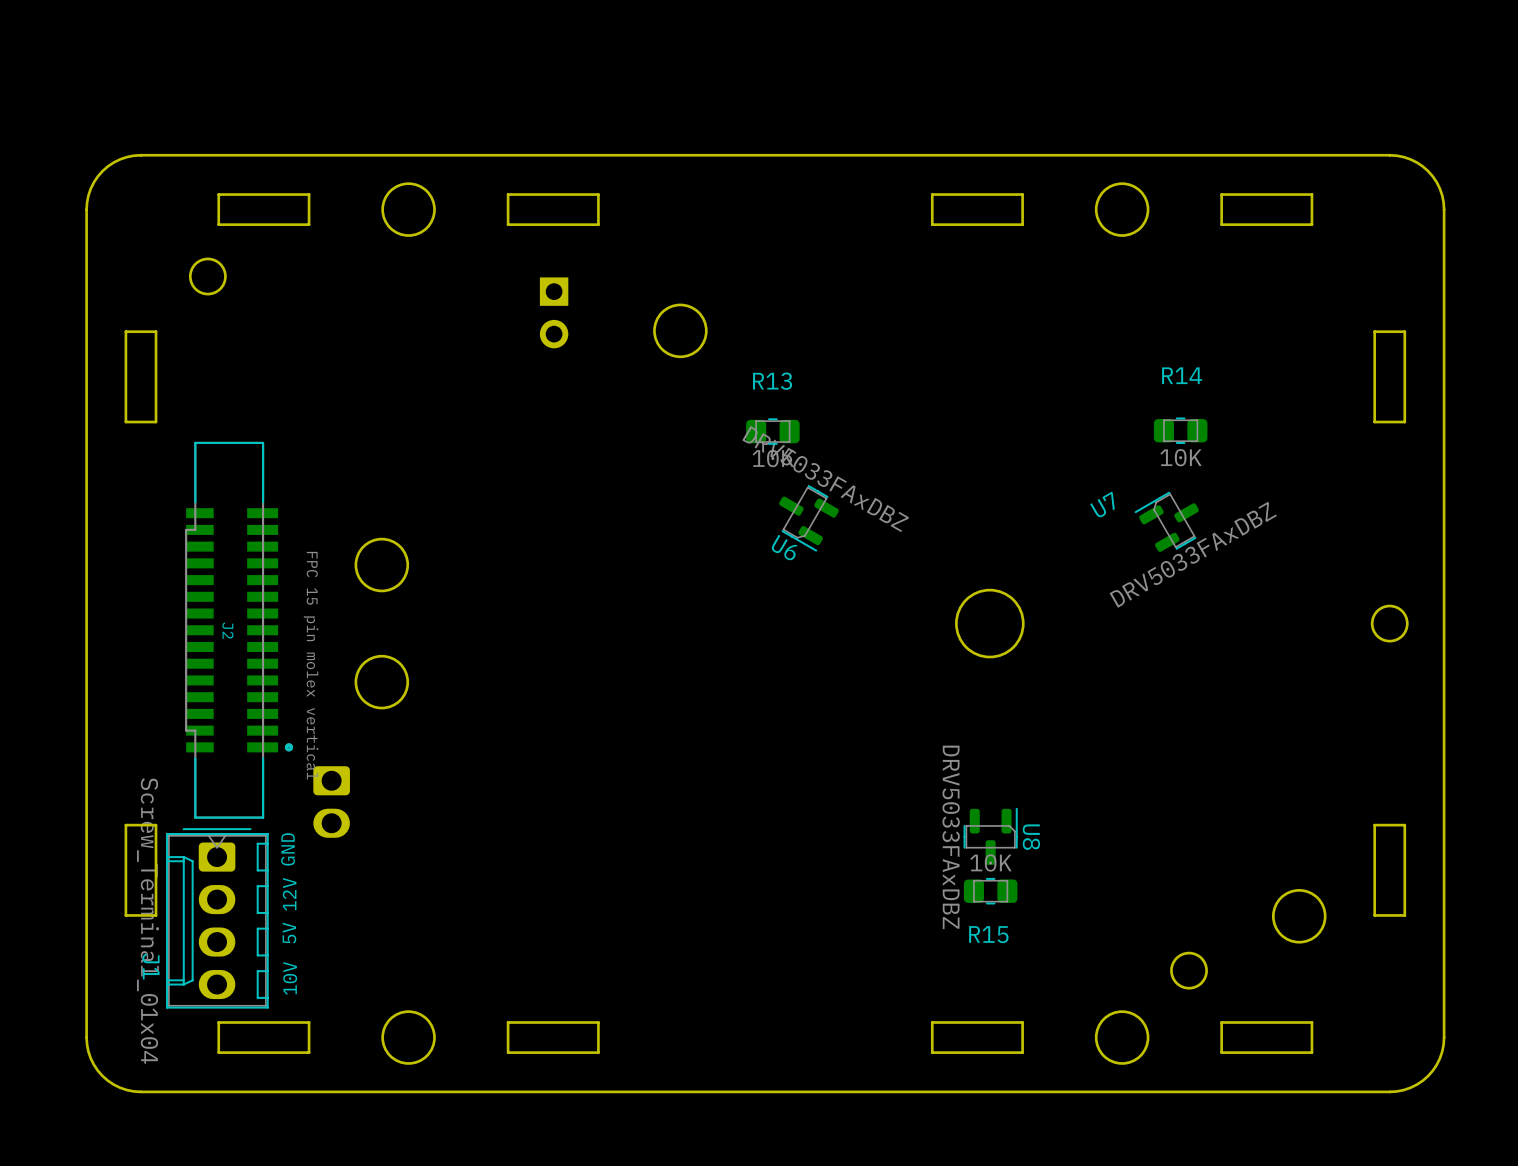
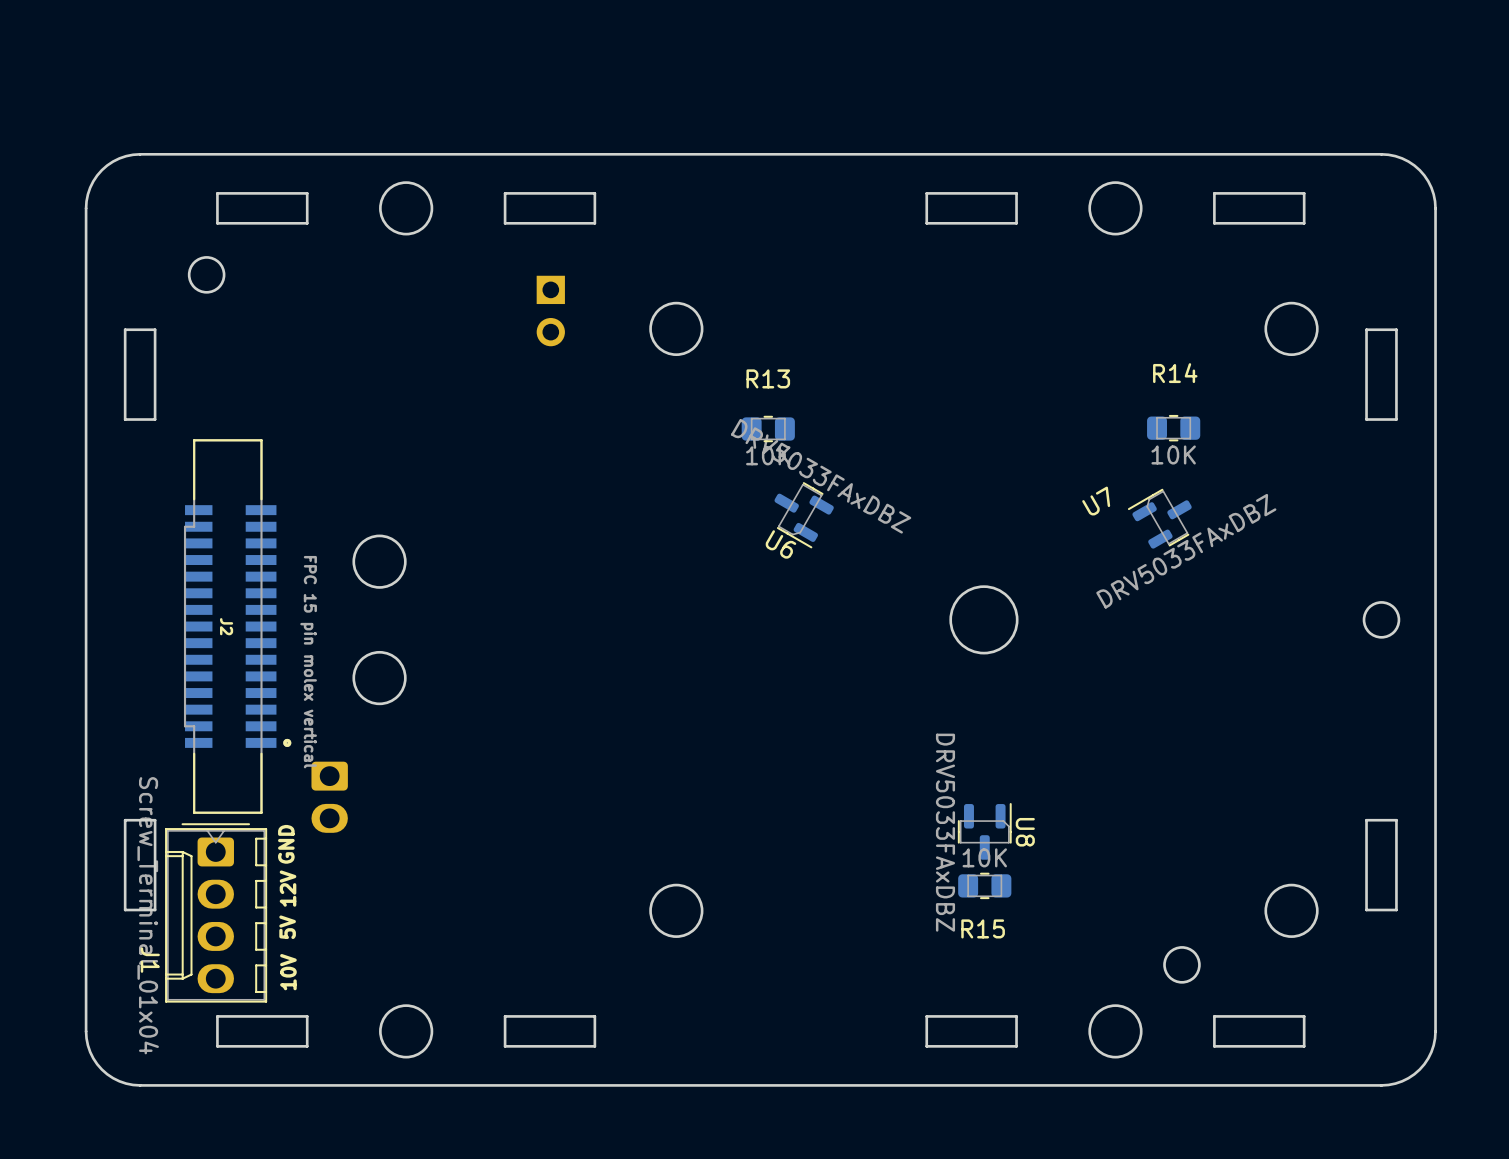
round board edge: none -> [1264, 301, 1319, 357]
round board edge: none -> [649, 883, 704, 938]

